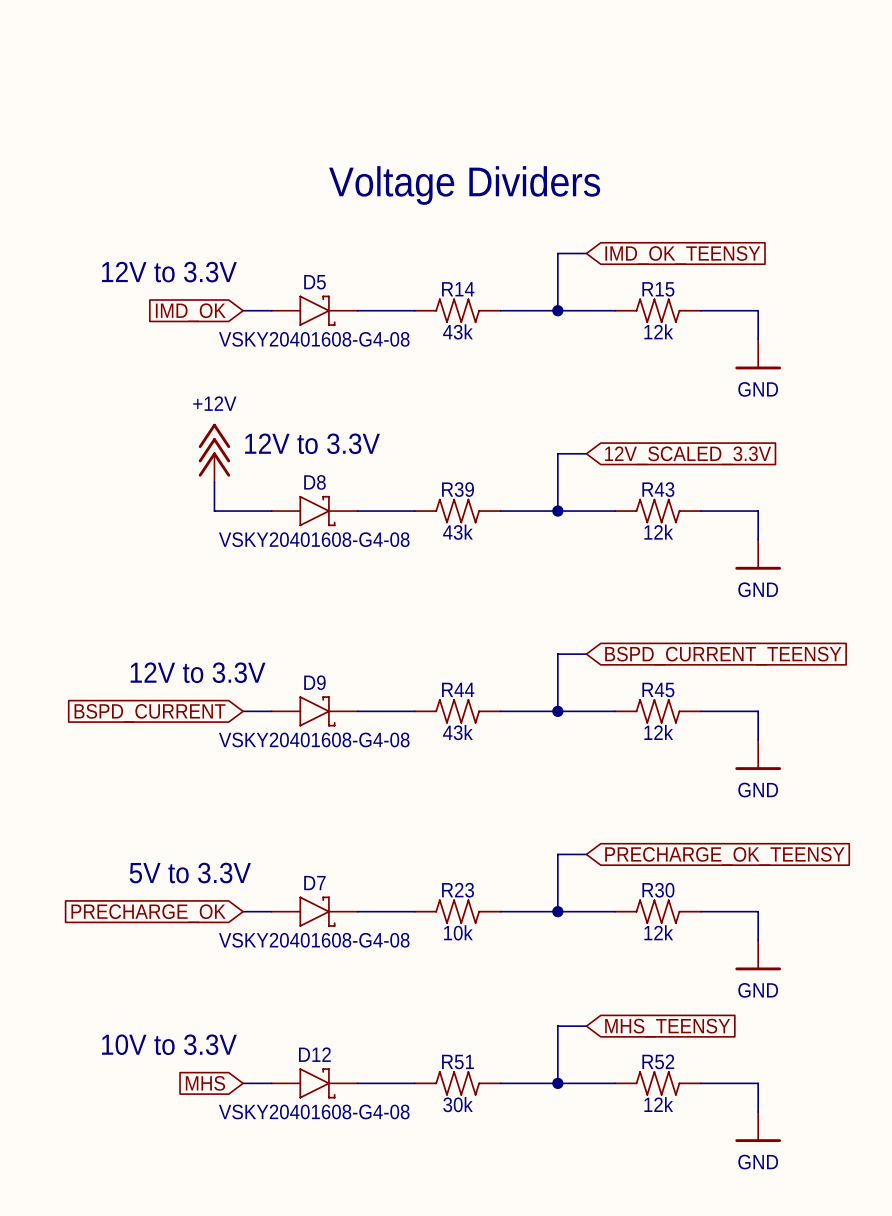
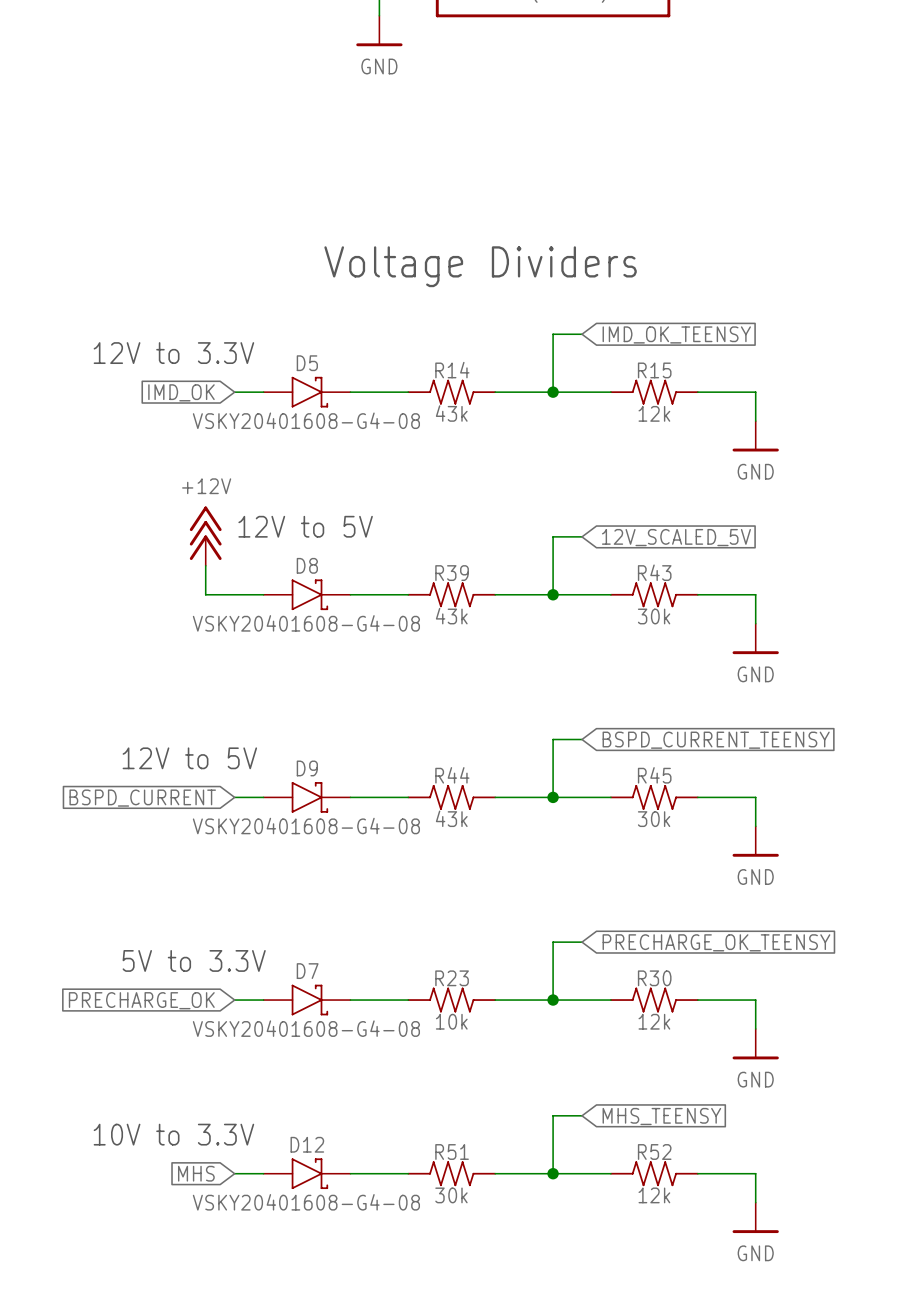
text: 12V to 3.3V (312, 443) -> 12V to 5V (305, 526)
global label: 12V_SCALED_3.3V (688, 455) -> 12V_SCALED_5V (676, 537)
R43 text: 12k (658, 532) -> 30k (654, 616)
text: 12V to 3.3V (198, 672) -> 12V to 5V (189, 758)
R45 text: 12k (658, 732) -> 30k (654, 819)

